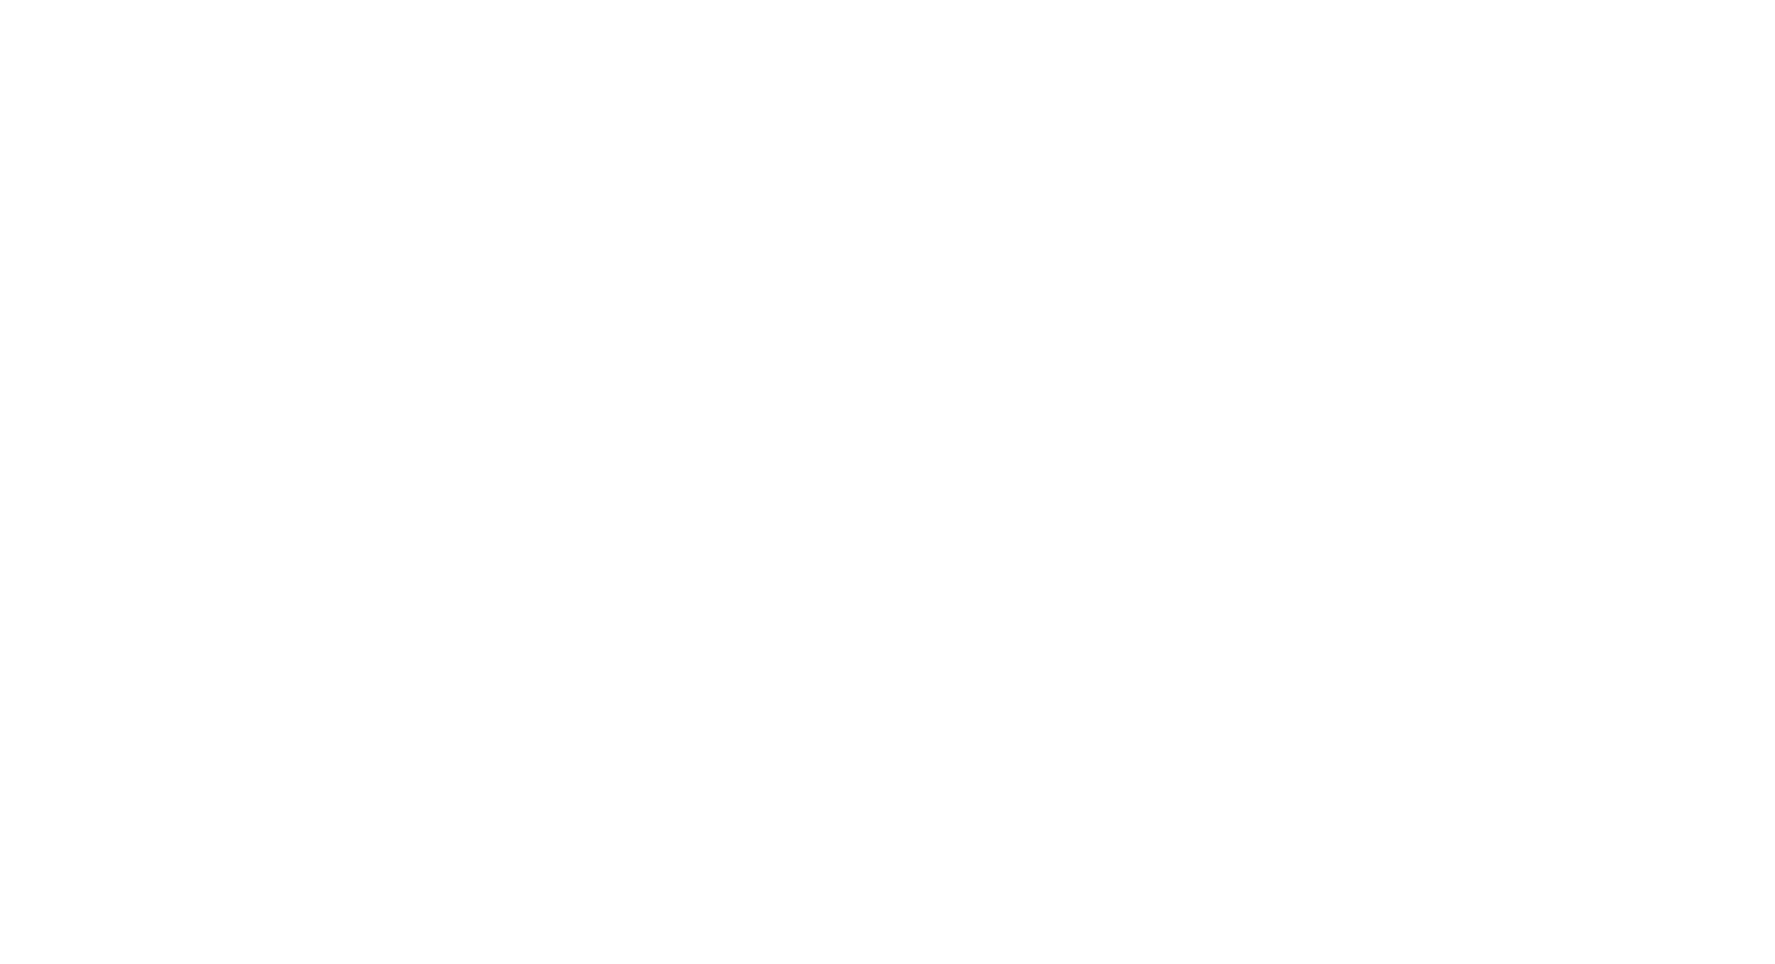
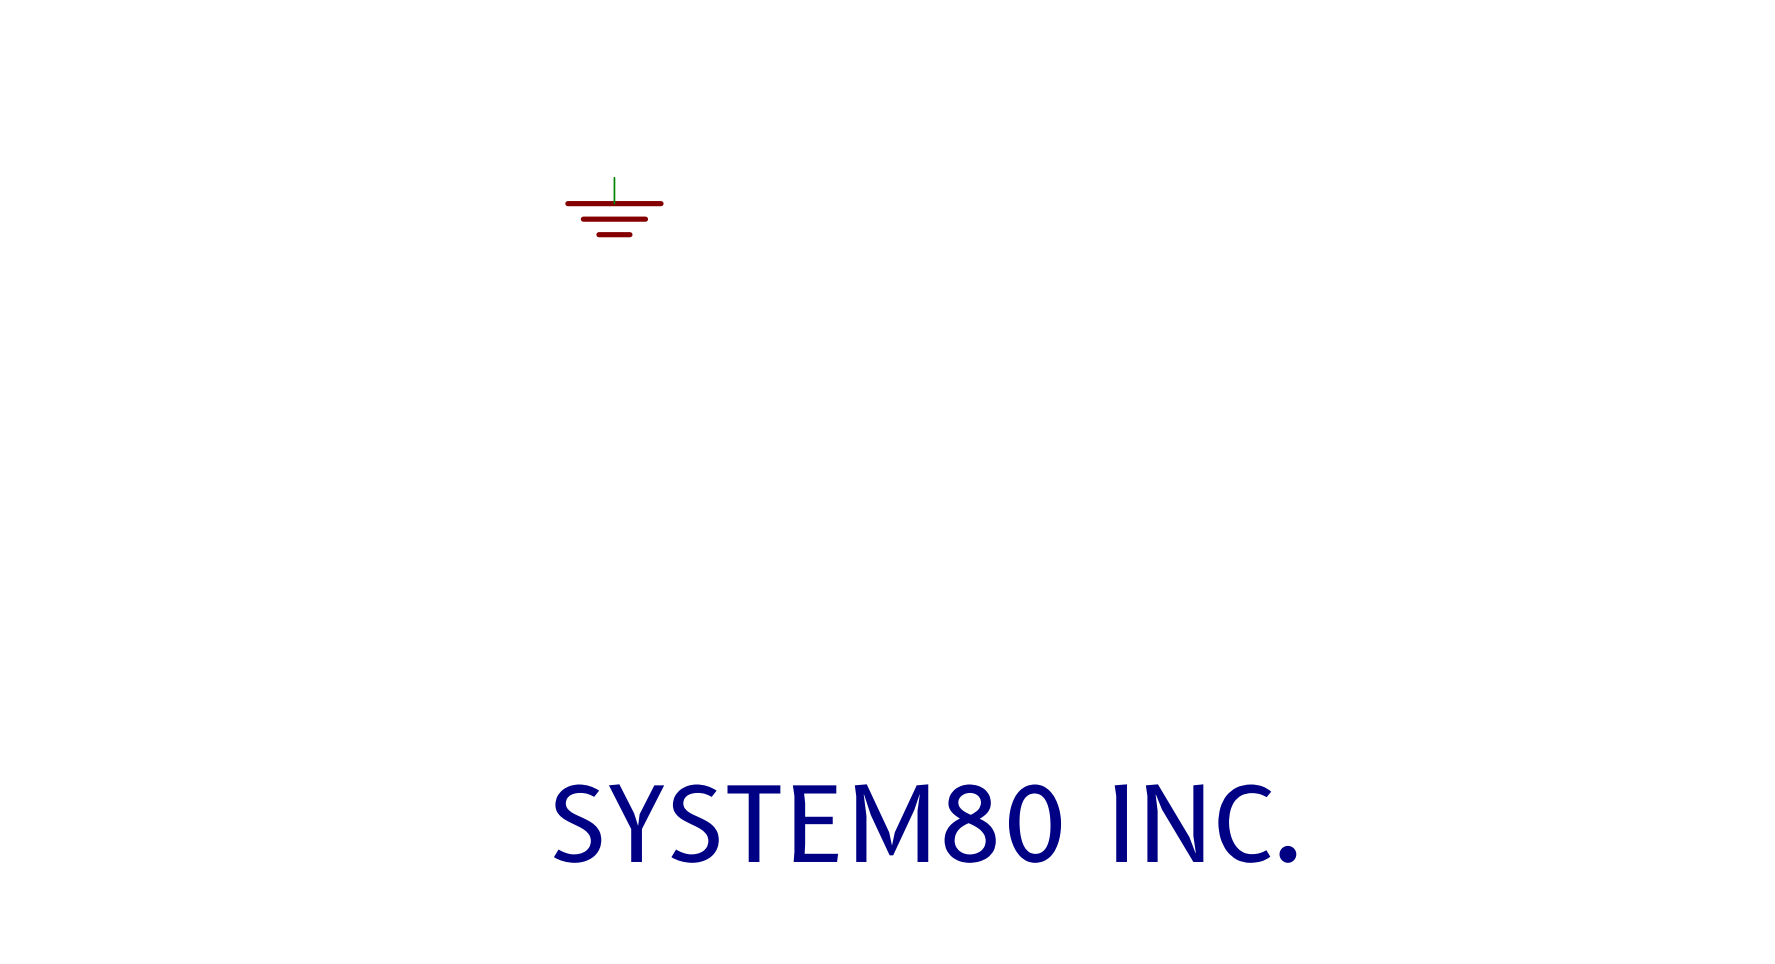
wire: none -> (614, 177) (614, 203)
power symbol: none -> (614, 219)
text: none -> SYSTEM80 INC. (925, 823)

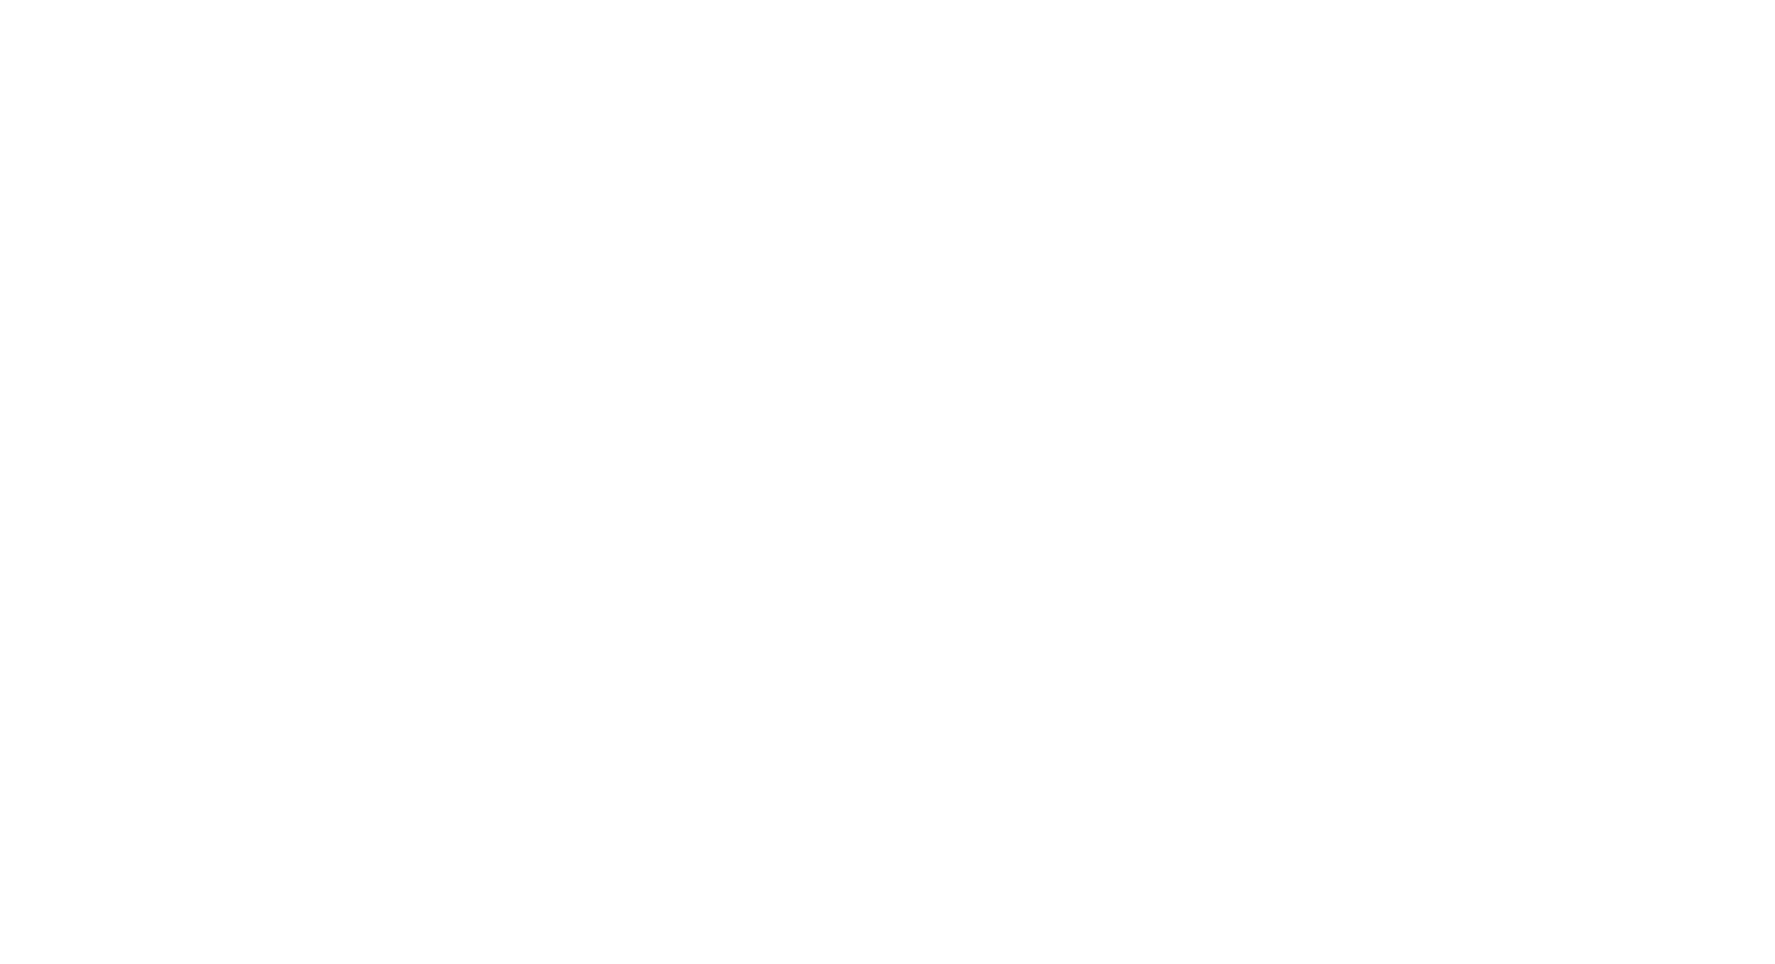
wire: (614, 177) (614, 203) -> none
power symbol: (614, 219) -> none
text: SYSTEM80 INC. (925, 823) -> none

